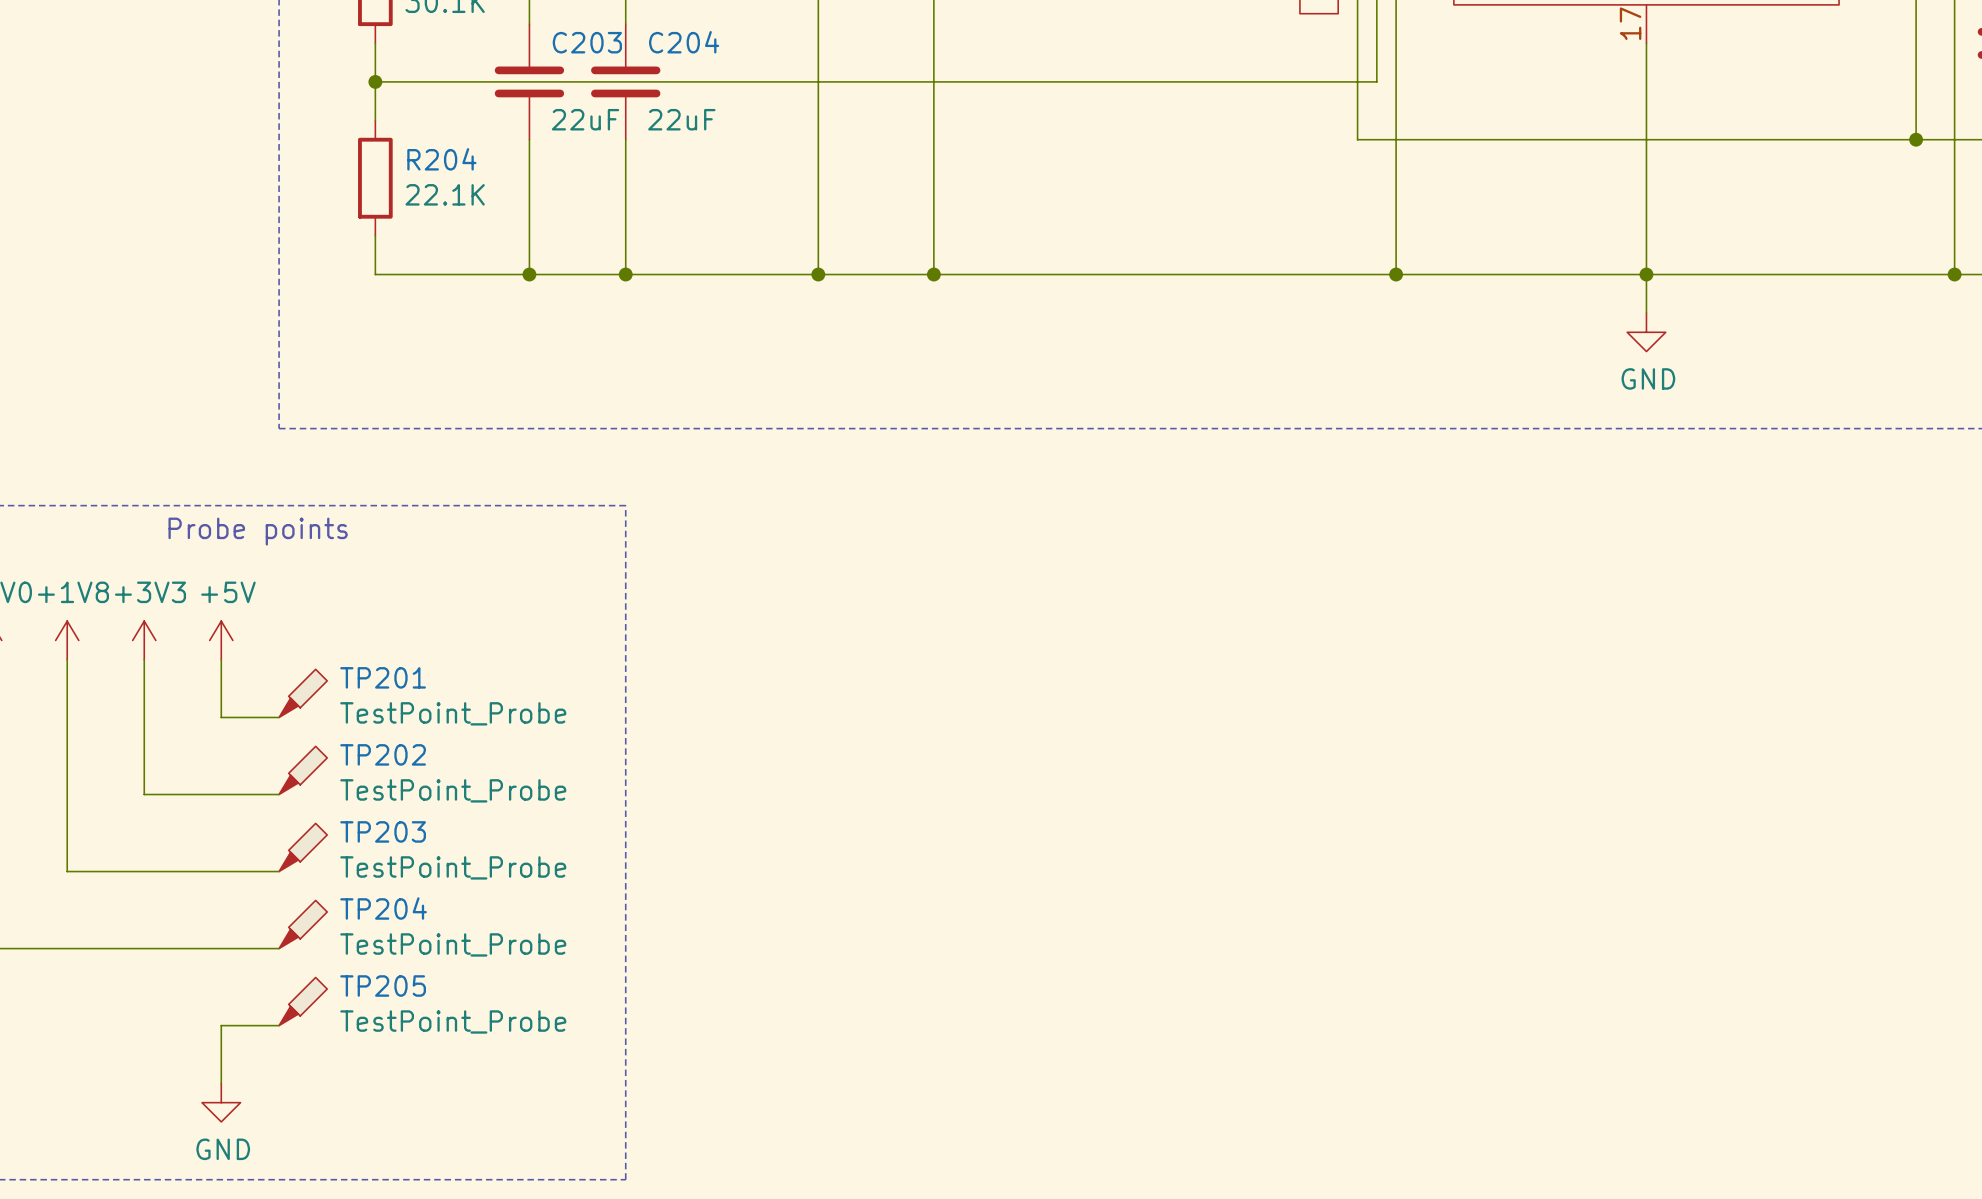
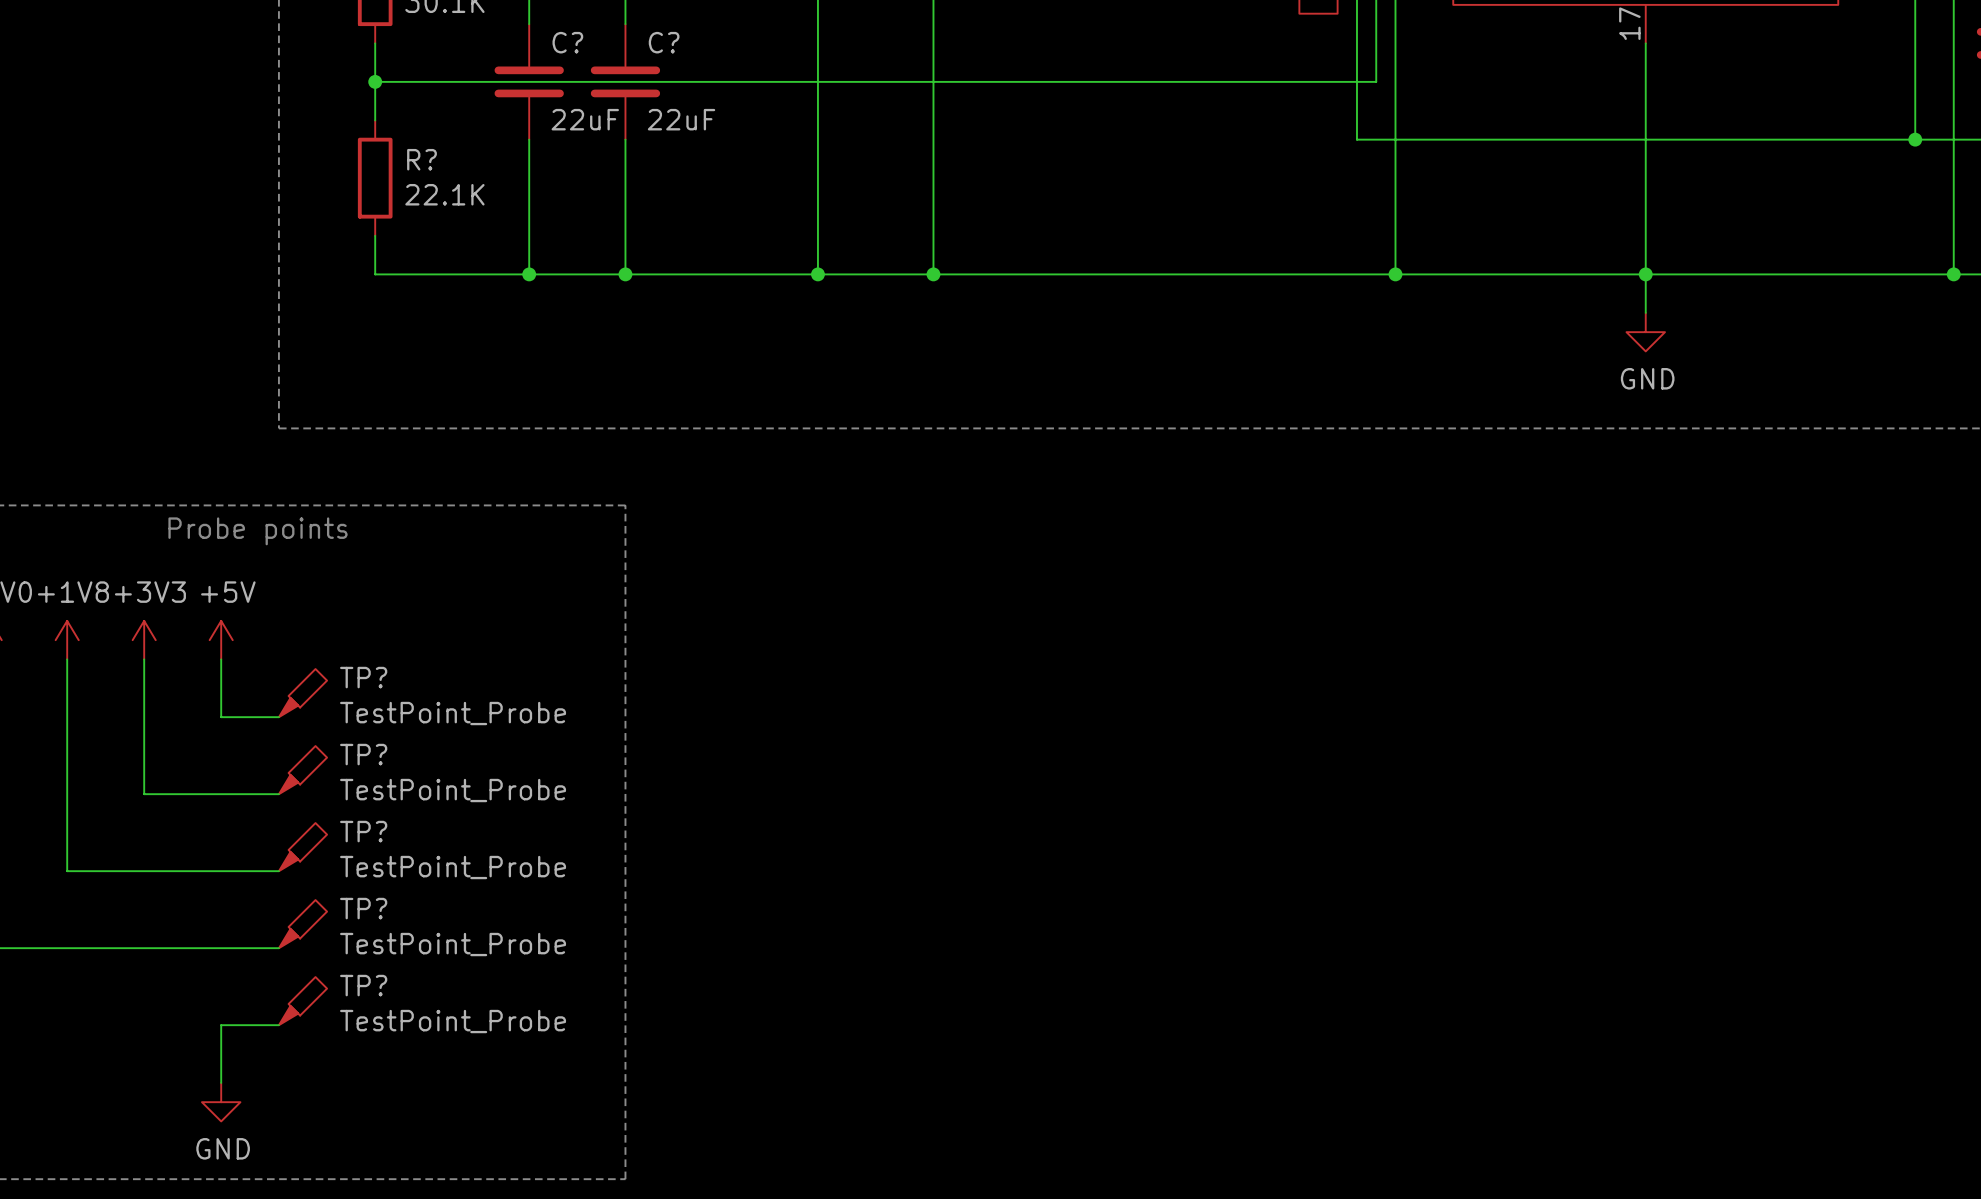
C203 name: C203 (587, 42) -> C? (567, 42)
C204 name: C204 (684, 42) -> C? (664, 42)
R204 name: R204 (441, 159) -> R? (422, 159)
TP201 name: TP201 (383, 677) -> TP? (363, 677)
TP202 name: TP202 (383, 754) -> TP? (363, 754)
TP203 name: TP203 (383, 831) -> TP? (363, 831)
TP204 name: TP204 (383, 908) -> TP? (363, 908)
TP205 name: TP205 (383, 986) -> TP? (363, 985)

